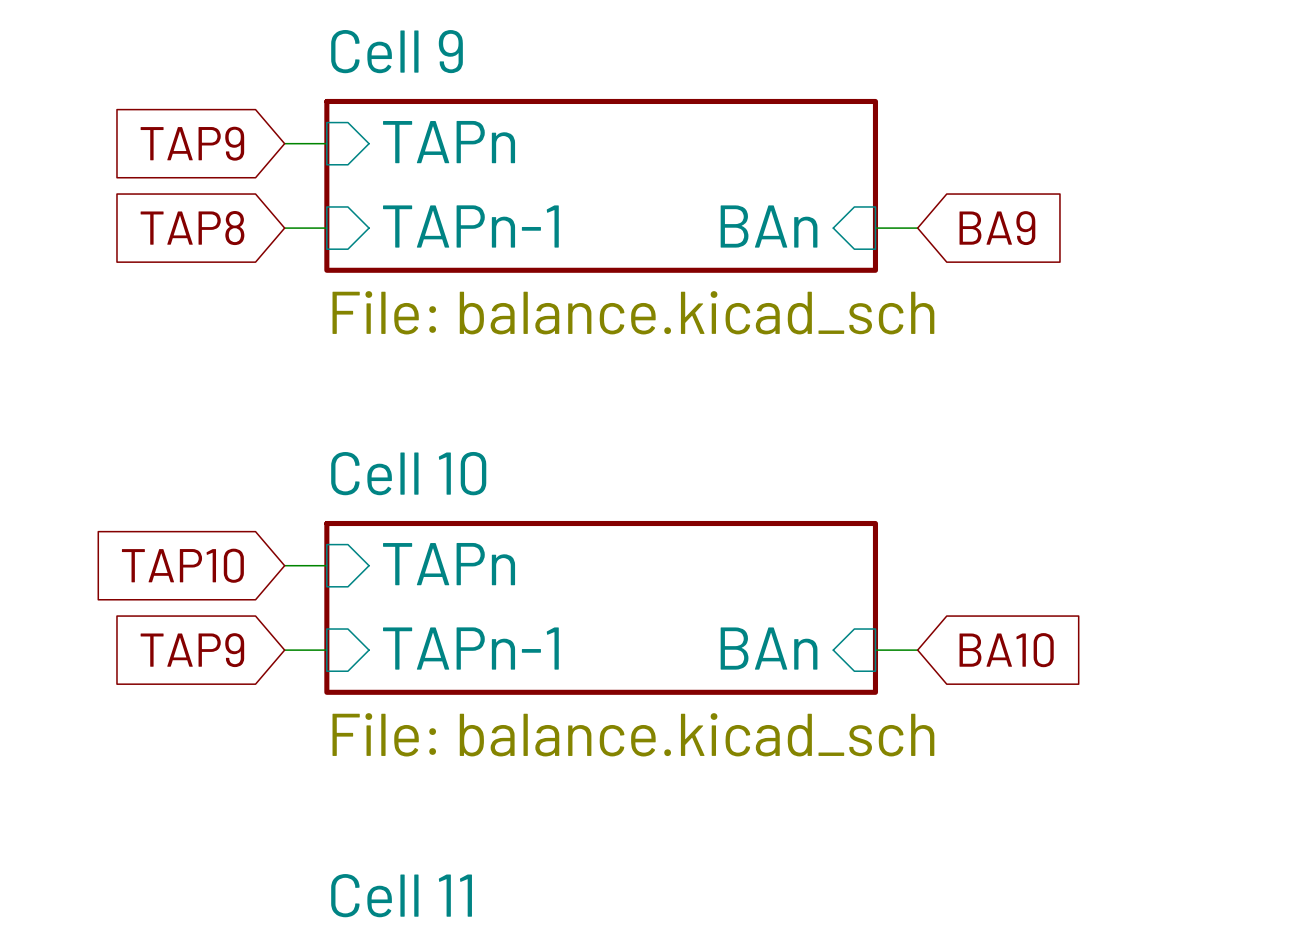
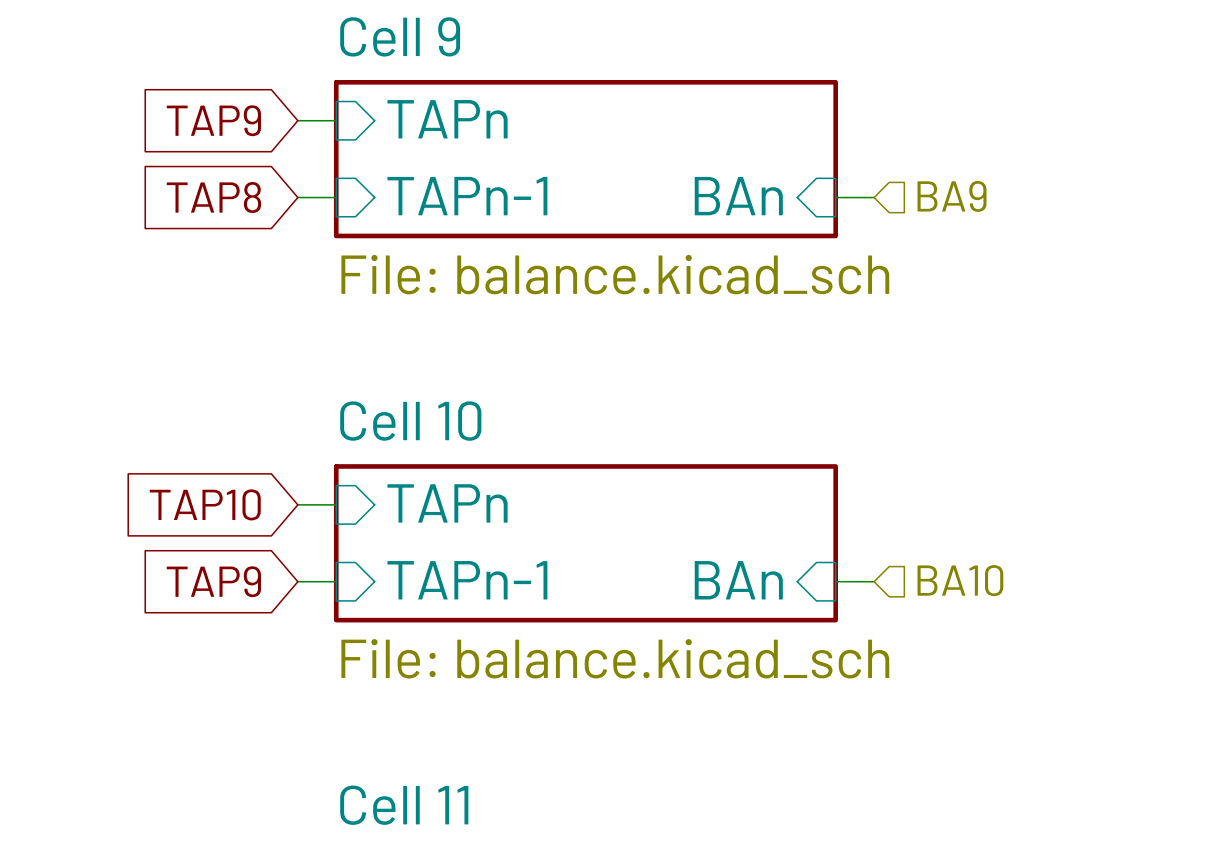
hierarchical label: none -> BA9 (952, 196)
global label: BA9 (997, 228) -> none
hierarchical label: none -> BA10 (960, 580)
global label: BA10 (1006, 650) -> none

